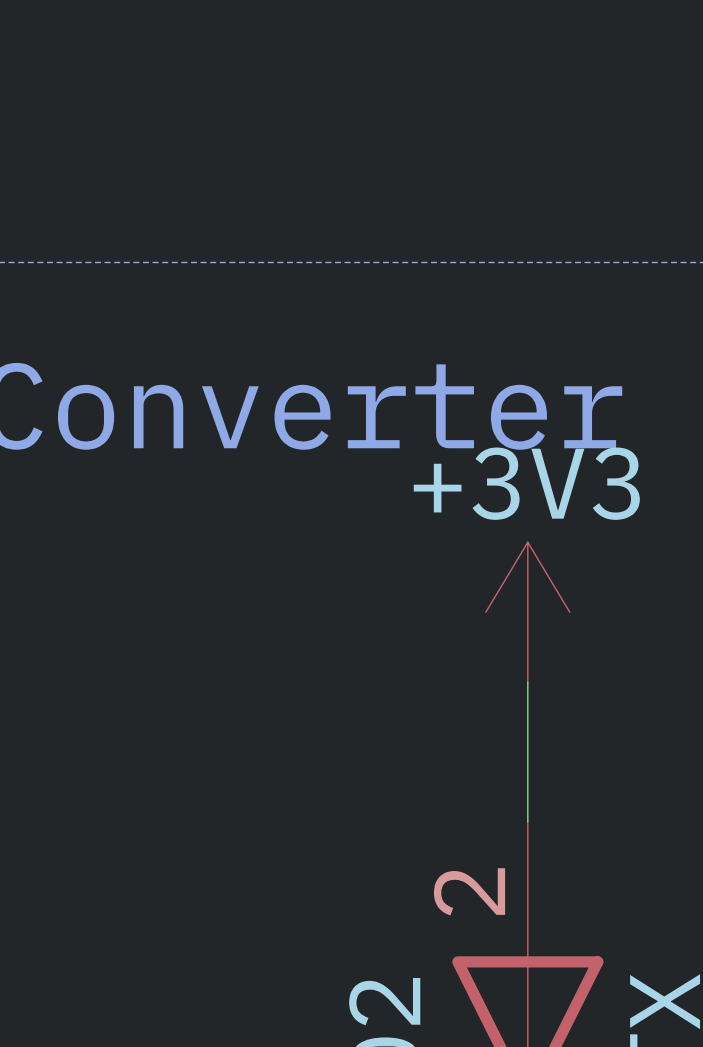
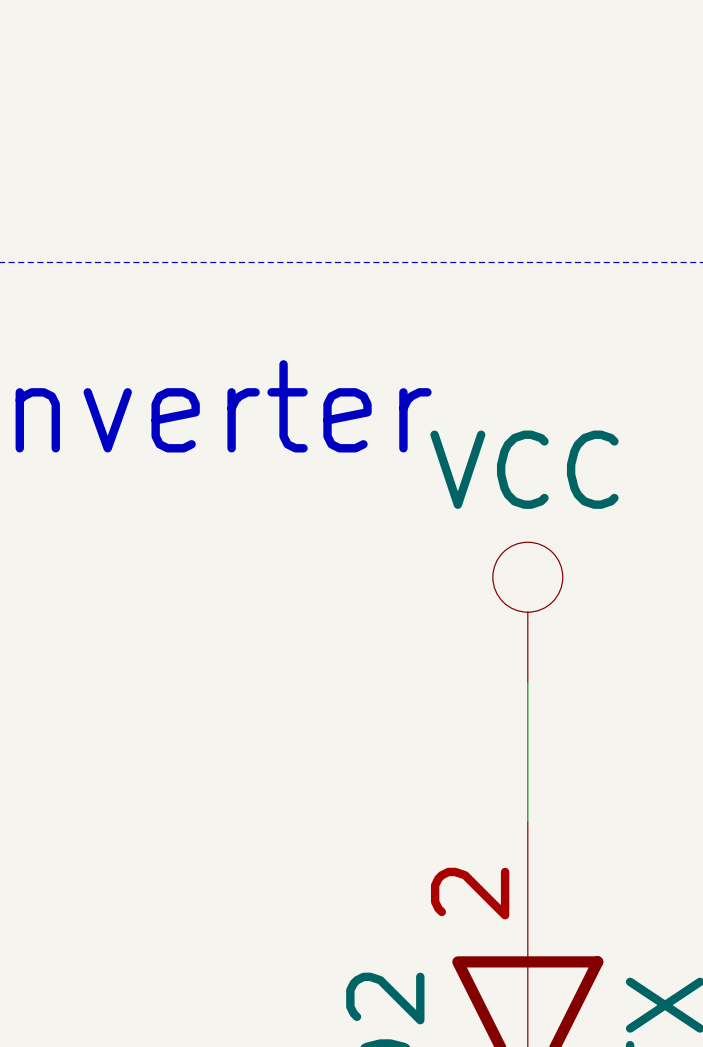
power symbol: +3V3 (527, 612) -> VCC (527, 612)

